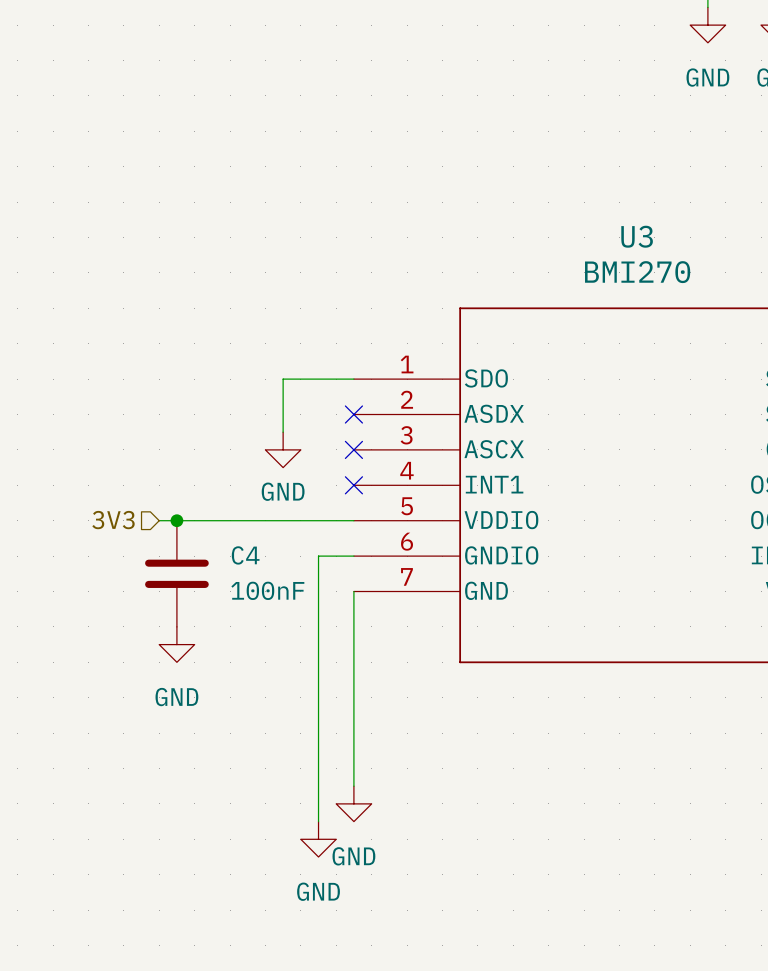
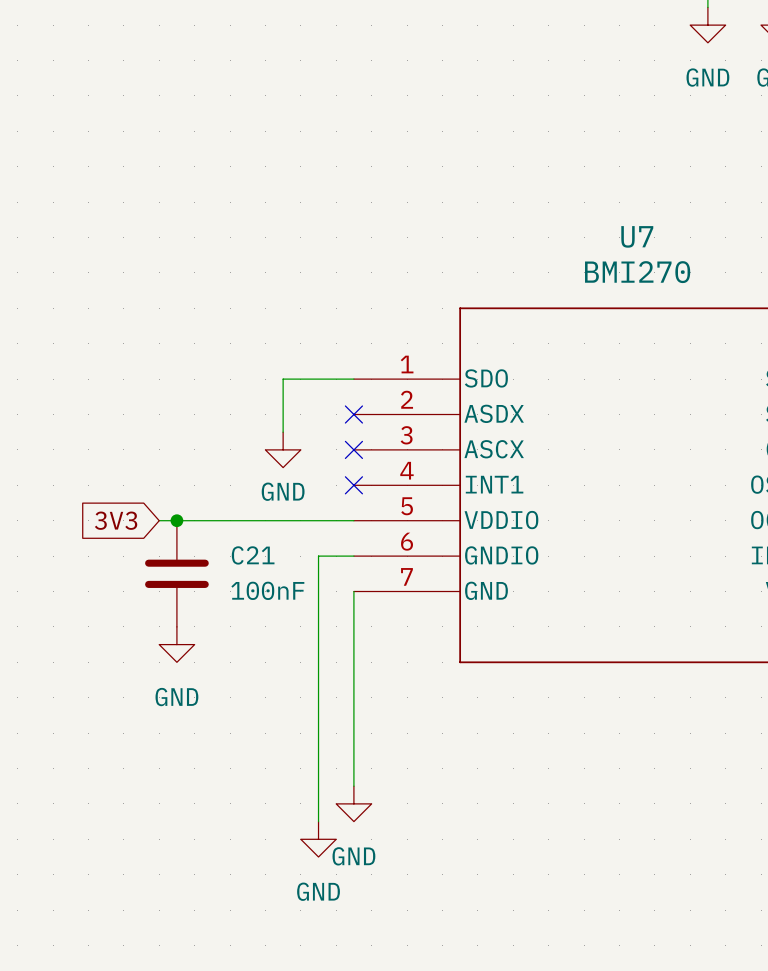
U3 name: U3 (637, 236) -> U7 (637, 236)
hierarchical label: 3V3 (113, 520) -> none
global label: none -> 3V3 (116, 520)
C4 name: C4 (245, 555) -> C21 (253, 555)

